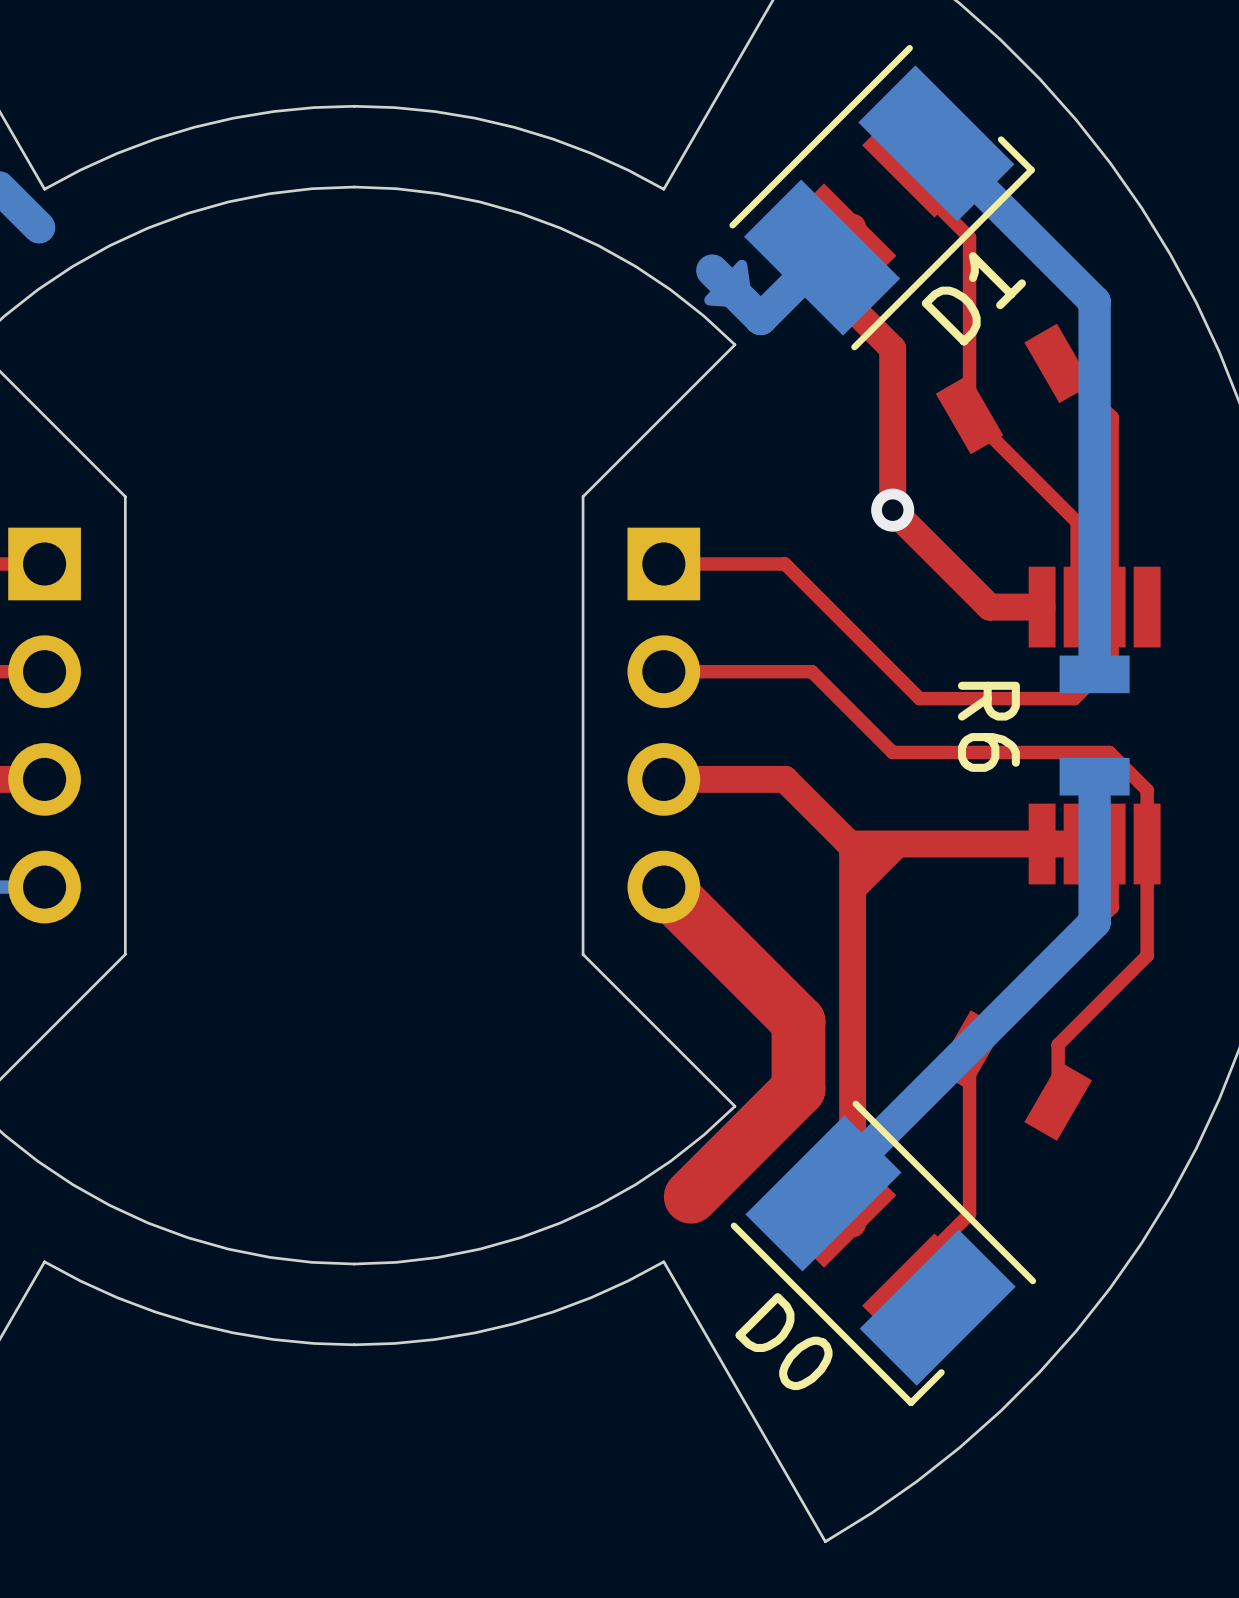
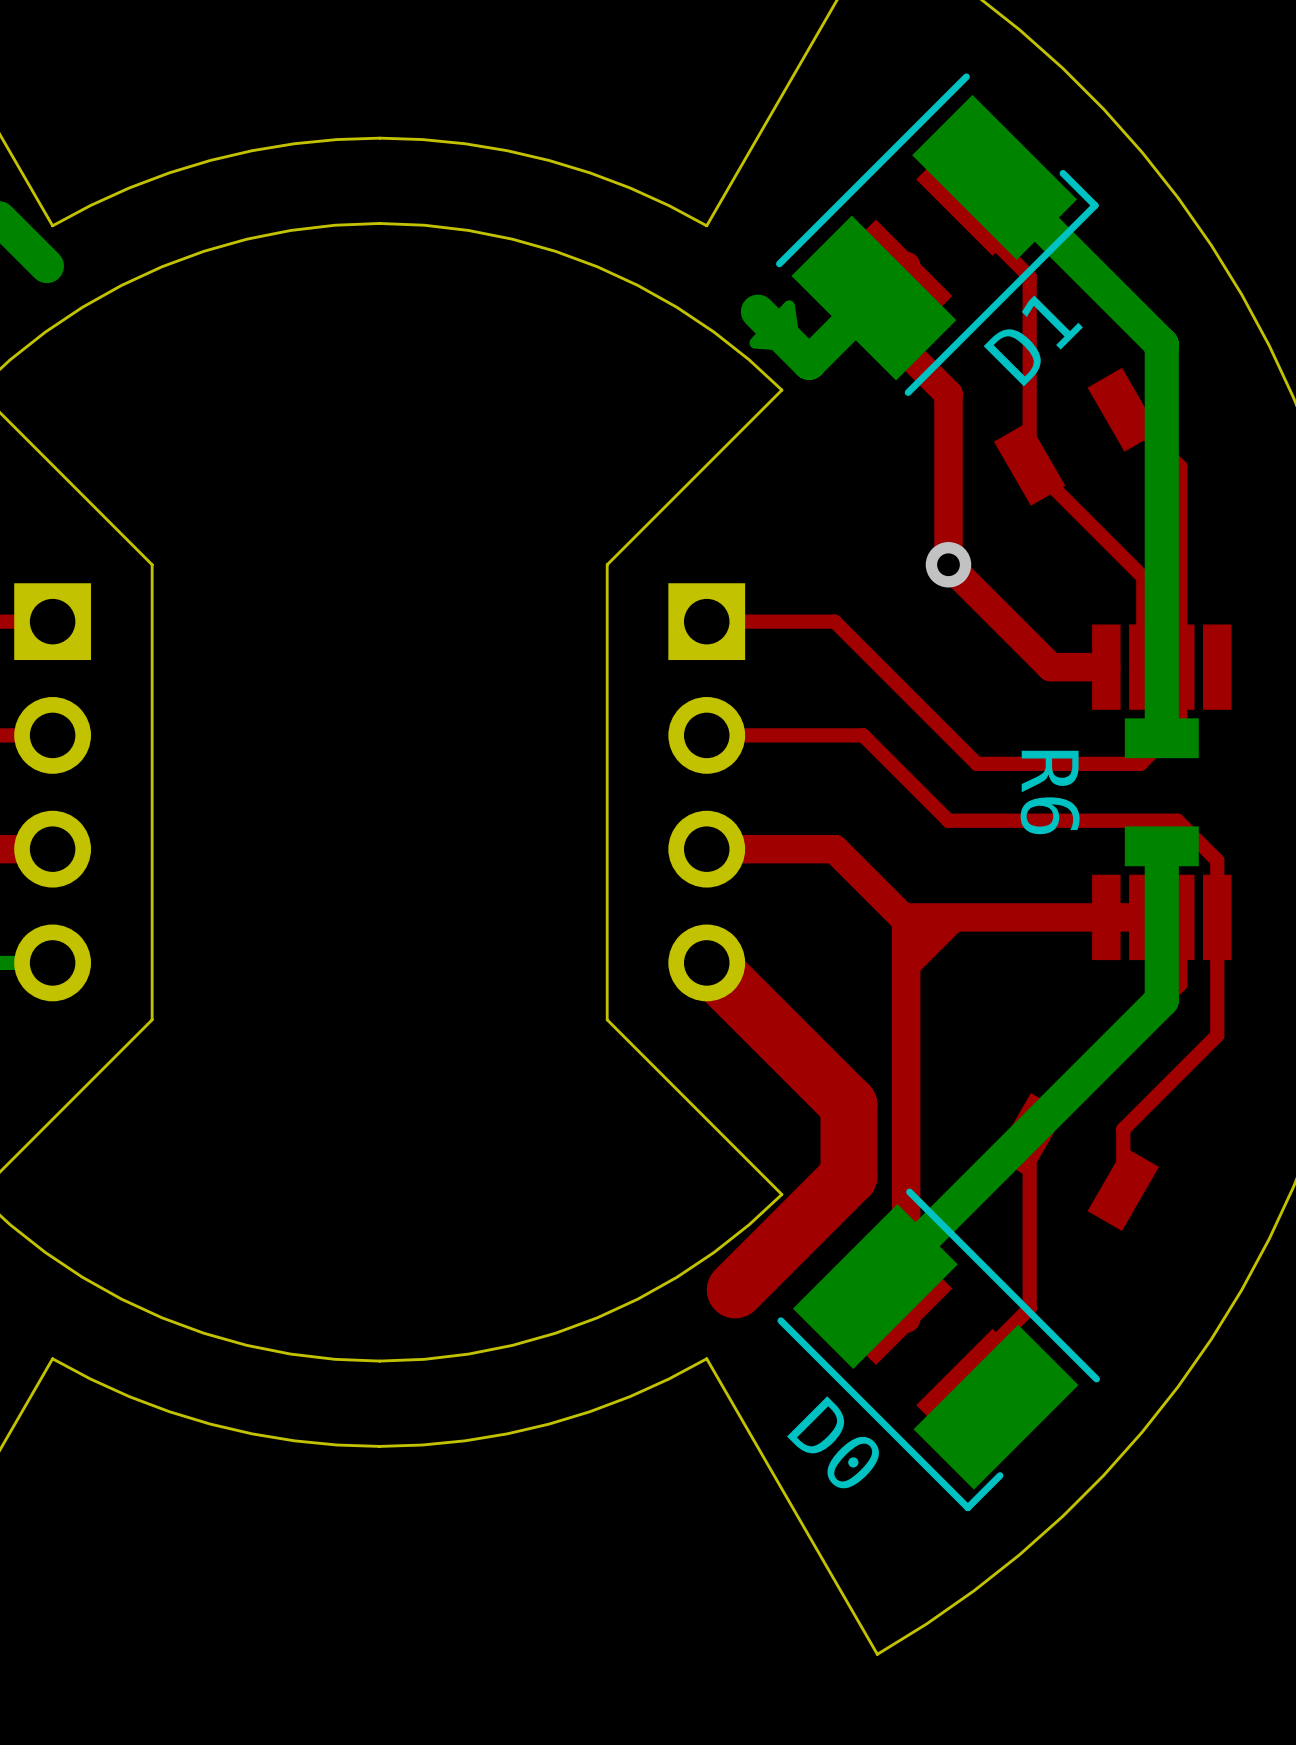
board edge: (125, 496) (125, 954) -> (137, 550) (152, 564) (152, 1019) (137, 1034)
board edge: (583, 496) (583, 954) -> (621, 550) (607, 564) (607, 1019) (621, 1034)

